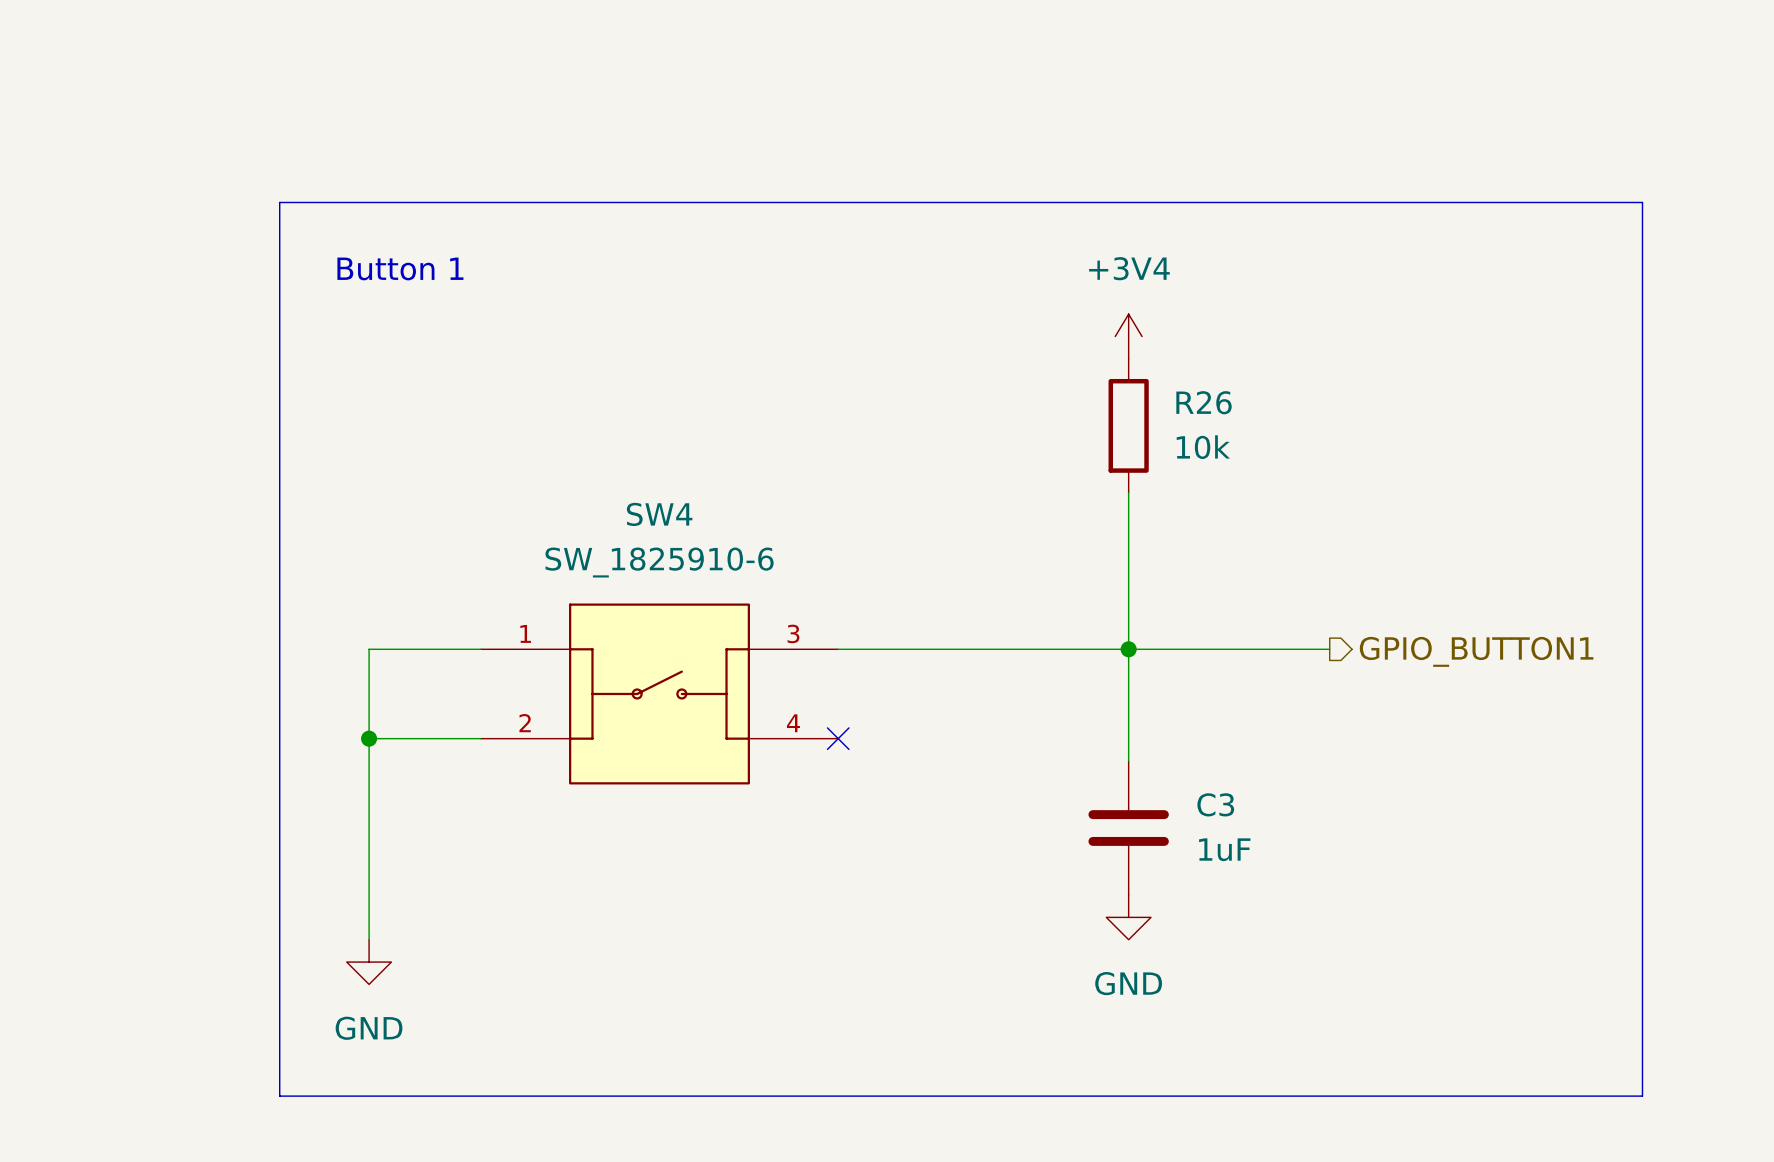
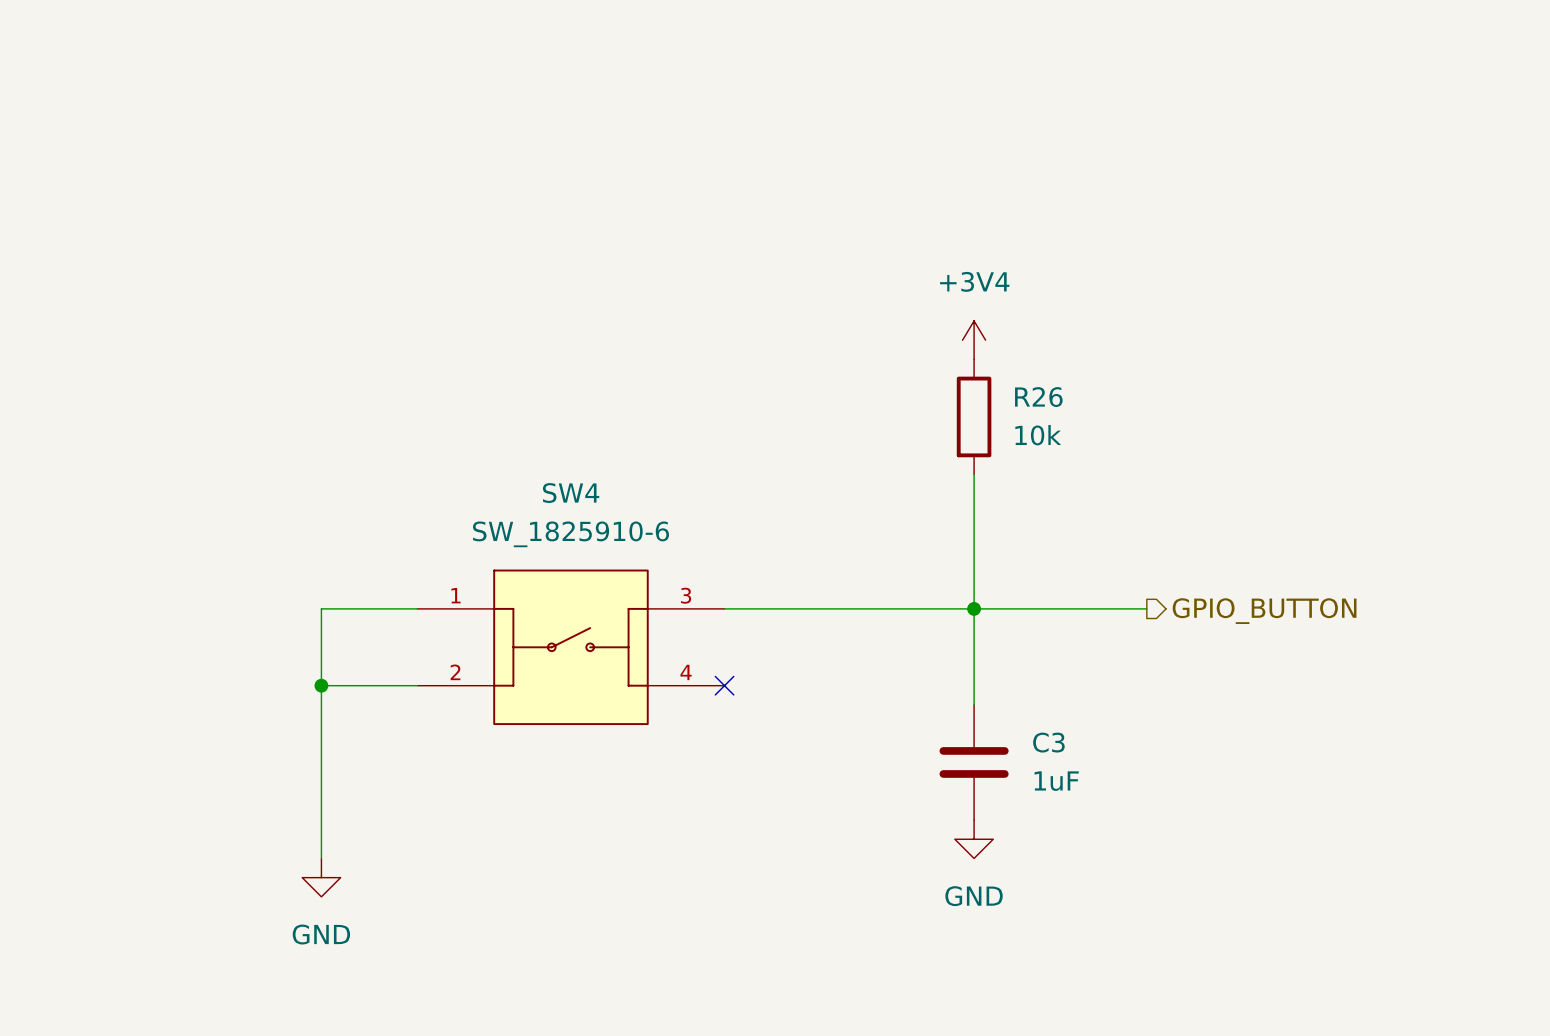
line: (279, 202) (1642, 202) (1642, 1096) (279, 1096) (279, 202) -> none
text: Button 1 (400, 268) -> none
hierarchical label: GPIO_BUTTON1 (1476, 651) -> GPIO_BUTTON (1264, 611)

